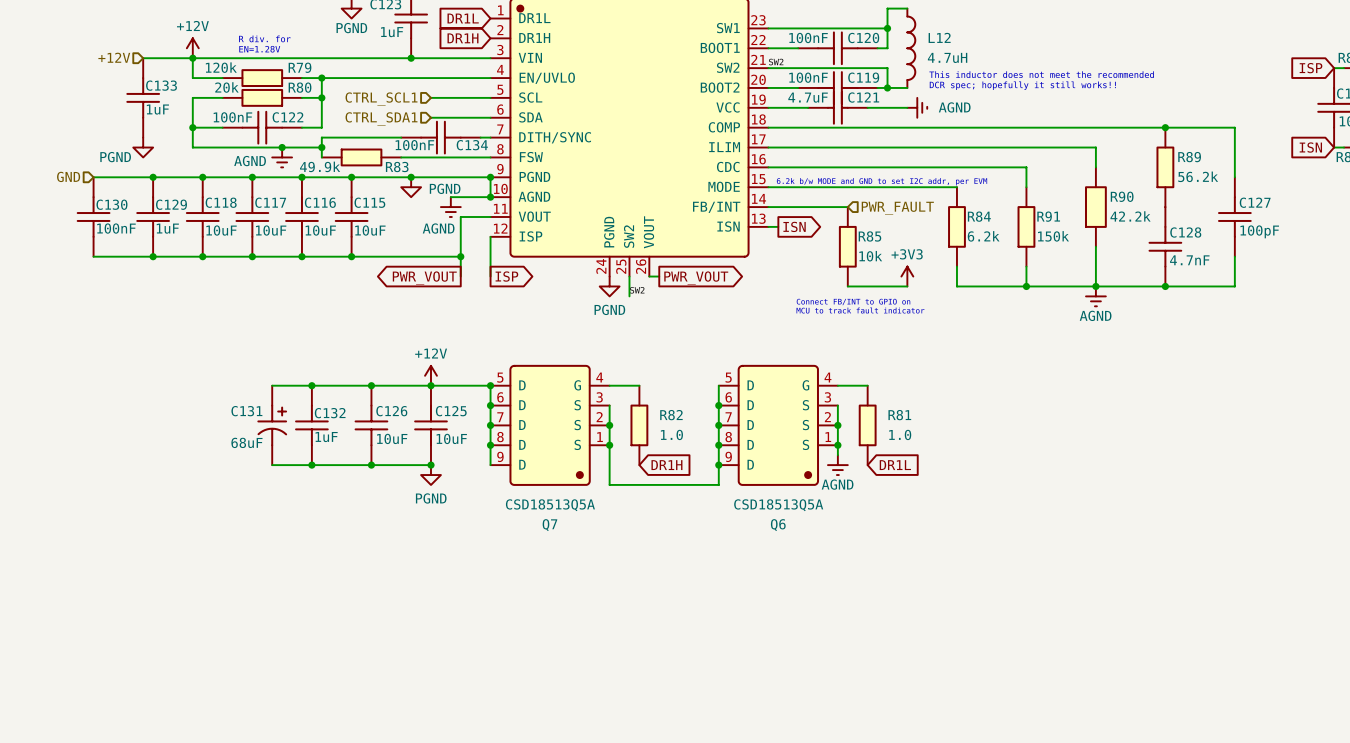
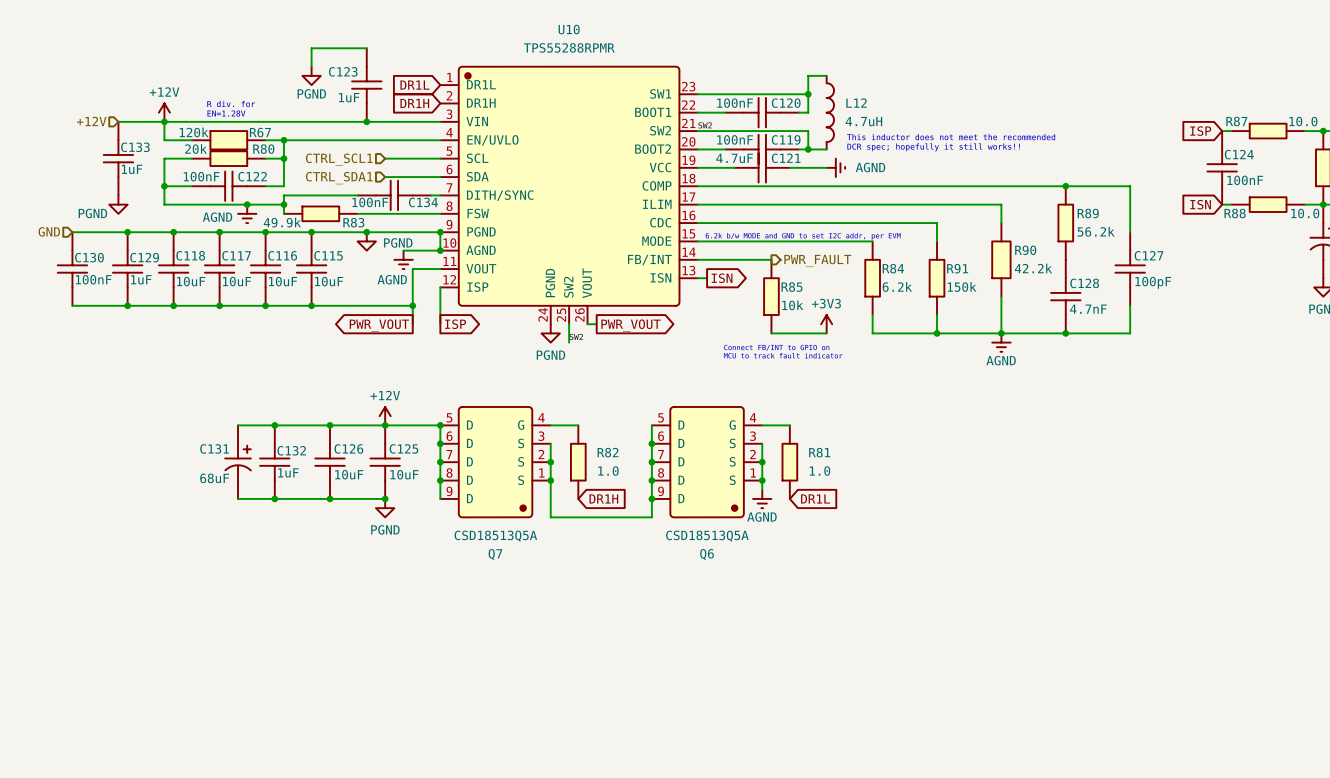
R79: 120k (262, 78) -> none
R67: none -> 120k (228, 140)
hierarchical label shape: input (897, 208) -> output (817, 260)

